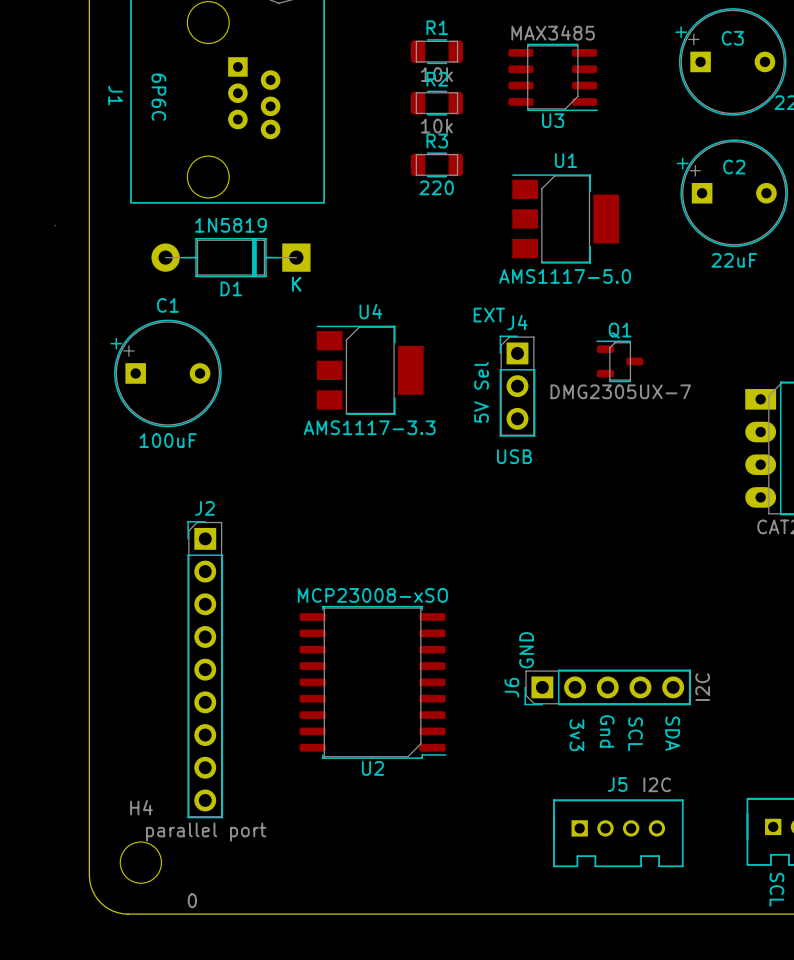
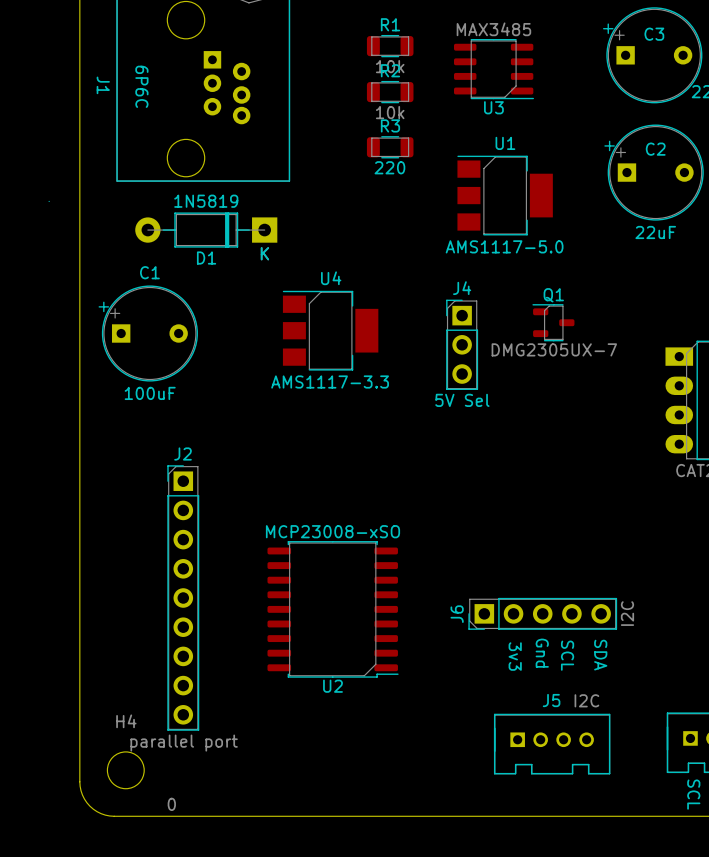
text: EXT (489, 315) -> none
J4 value rotation: 0° (481, 392) -> 90° clockwise (462, 400)
text: USB (514, 456) -> none
text: GND (526, 650) -> none

